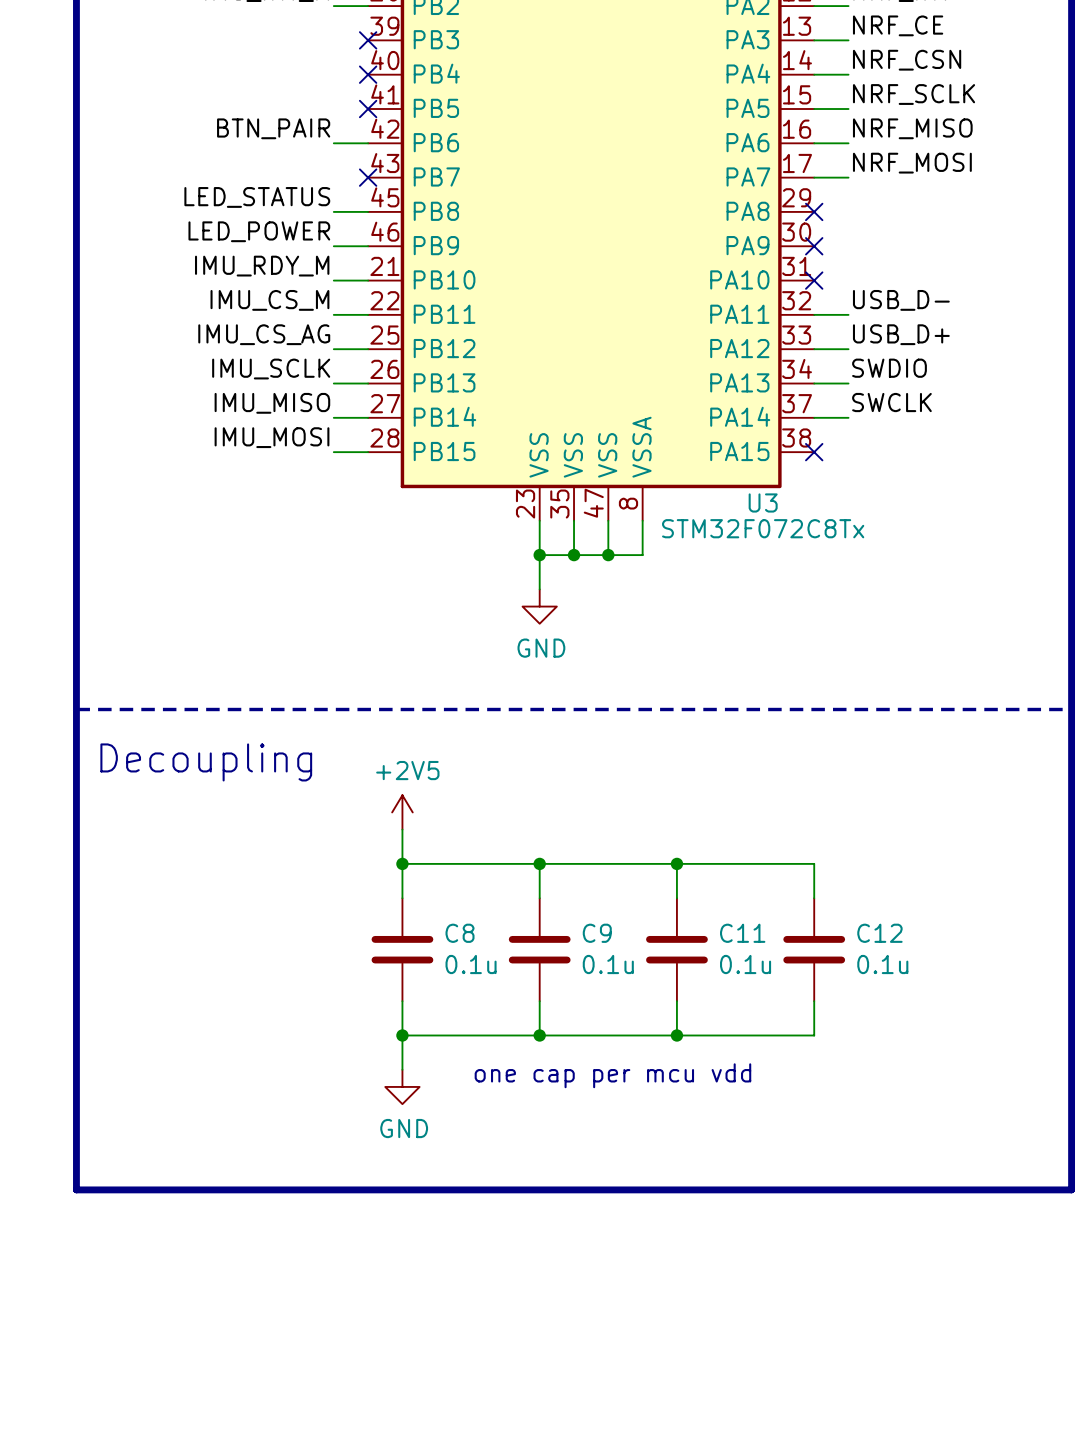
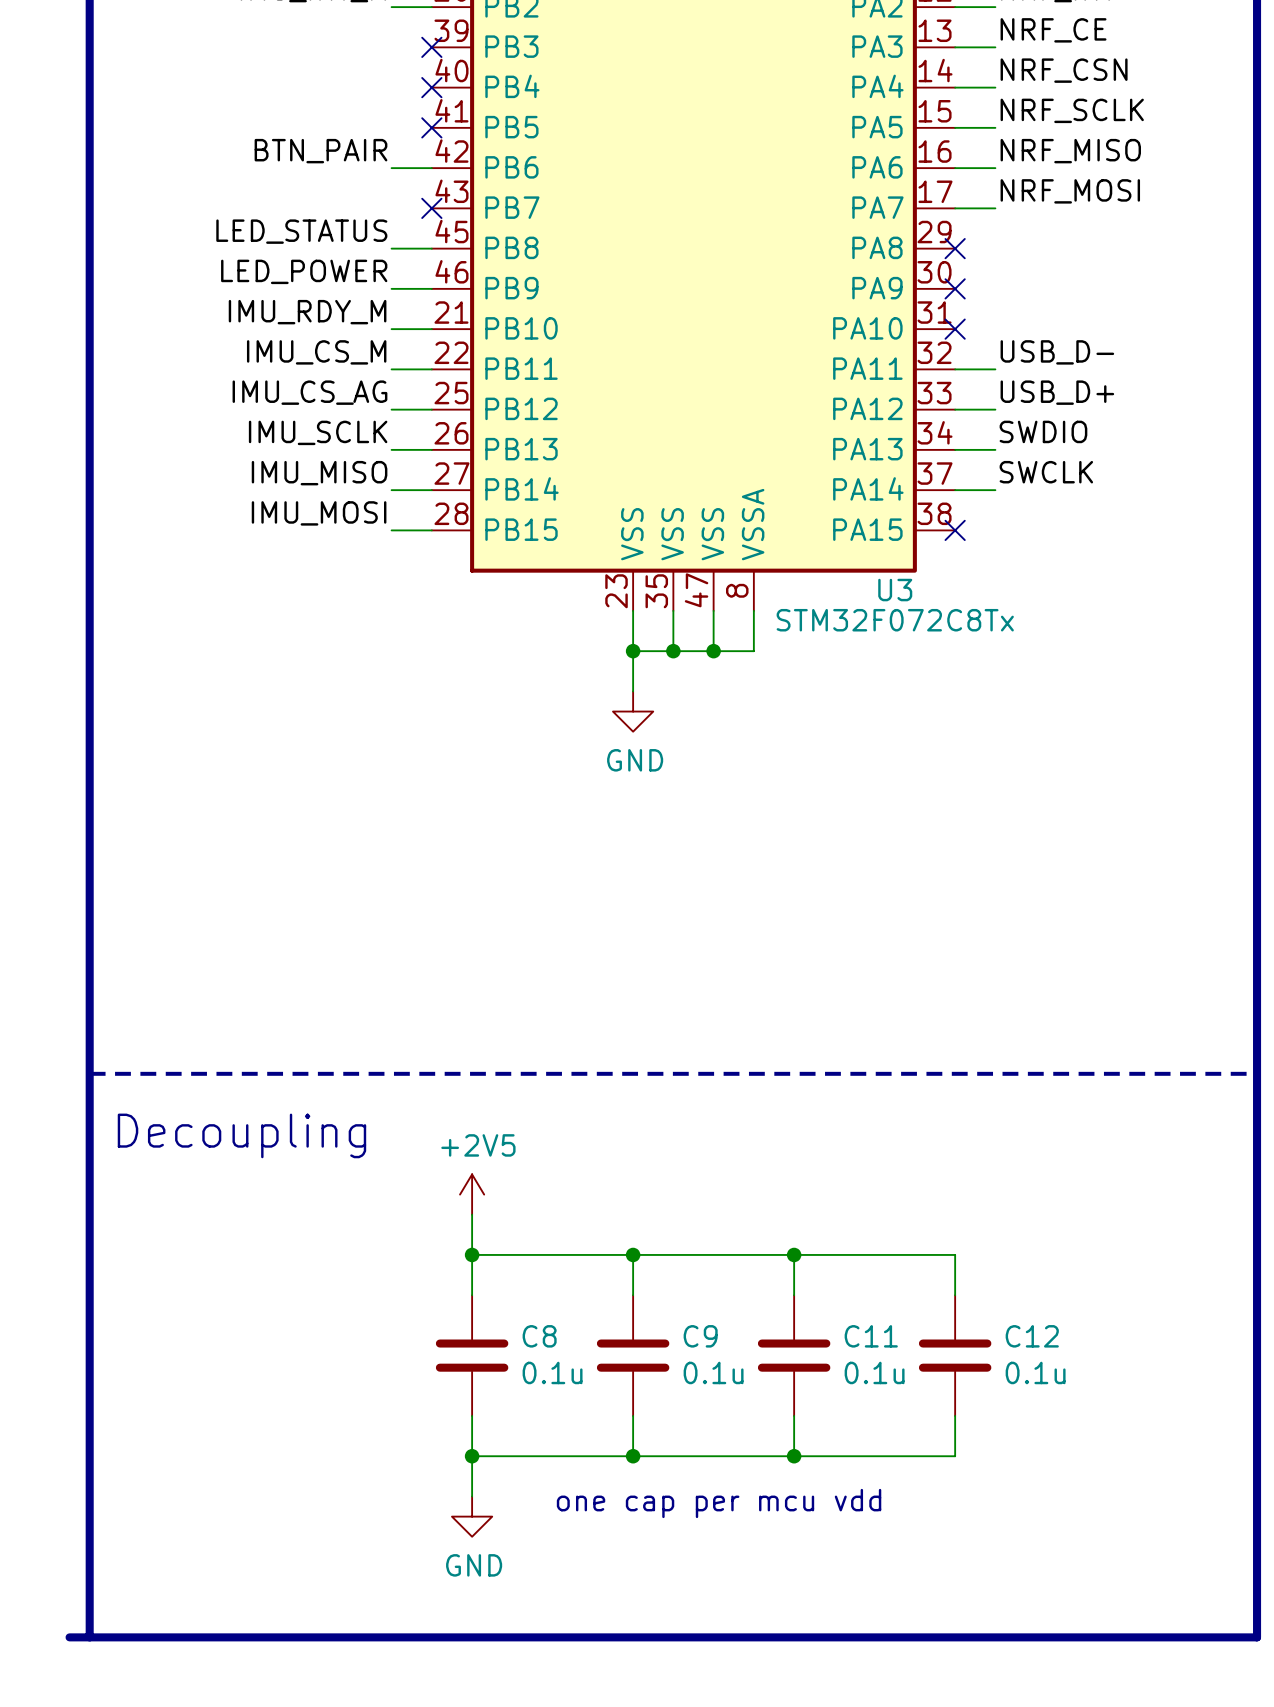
line: (76, 709) (1071, 709) -> (89, 1073) (1257, 1073)
text position: Decoupling (206, 762) -> Decoupling (241, 1135)
power symbol position: +2V5 (402, 812) -> +2V5 (472, 1194)
wire: (402, 829) (402, 898) -> none
wire: (402, 863) (814, 863) (814, 898) -> none
junction: (402, 863) -> none
wire: (539, 863) (539, 898) -> (633, 1254) (633, 1295)
junction: (539, 863) -> none
wire: (676, 863) (676, 898) -> (794, 1254) (794, 1295)
junction: (676, 863) -> none
C8 position: (402, 949) -> (472, 1355)
C9 position: (539, 949) -> (633, 1355)
C11 position: (676, 949) -> (794, 1355)
C12 position: (814, 949) -> (955, 1355)
wire: (402, 1001) (402, 1035) (814, 1035) (814, 1001) -> none
wire: (539, 1001) (539, 1035) -> (633, 1415) (633, 1456)
wire: (676, 1001) (676, 1035) -> (794, 1415) (794, 1456)
junction position: (402, 1035) -> (472, 1254)
junction position: (539, 1035) -> (633, 1254)
junction position: (676, 1035) -> (794, 1254)
text position: one cap per mcu vdd (612, 1075) -> one cap per mcu vdd (719, 1503)
power symbol position: GND (402, 1086) -> GND (472, 1516)
wire: none -> (472, 1295) (472, 1254) (955, 1254) (955, 1295)
line: (76, 1189) (1071, 1189) -> (69, 1637) (1257, 1637) (1257, 1395)
line: none -> (89, 1395) (89, 1637)
wire: none -> (472, 1415) (472, 1496)
wire: none -> (955, 1415) (955, 1456) (472, 1456)
junction: none -> (472, 1456)
junction: none -> (633, 1456)
junction: none -> (794, 1456)

